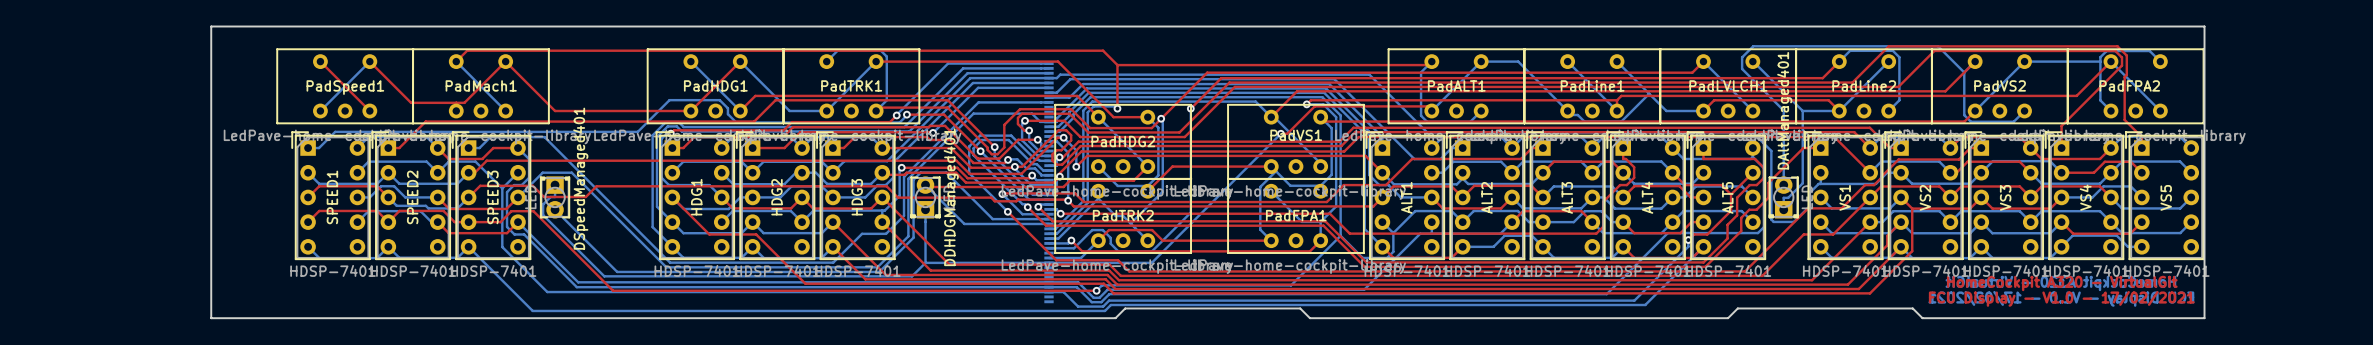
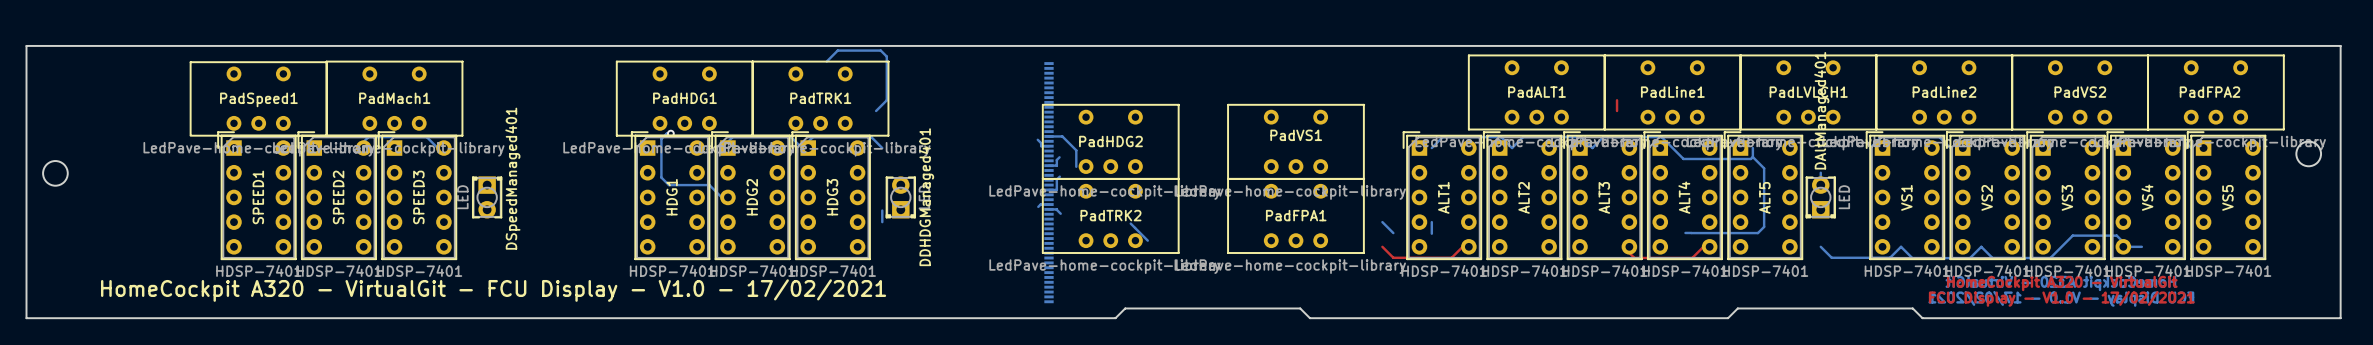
PadSpeed1 footprint: [276, 48, 414, 124] -> [190, 61, 328, 137]
top track: (320, 61) (369, 110) -> none
bottom track: (369, 61) (320, 110) -> none
top track: (369, 61) (411, 102) (464, 102) (505, 61) (555, 110) (690, 110) (740, 61) -> none
bottom track: (456, 61) (505, 110) -> none
top track: (456, 61) (467, 50) (1103, 50) (1117, 65) -> none
bottom track: (690, 61) (740, 110) -> none
bottom track: (740, 61) (789, 110) (826, 110) (876, 61) -> none
top track: (876, 61) (1058, 61) (1113, 117) (1147, 117) -> none
bottom track: (1431, 61) (1421, 72) (1421, 115) (1427, 121) (1470, 121) (1481, 110) -> none
top track: (1431, 61) (1428, 65) (1117, 65) -> none
bottom track: (1567, 61) (1617, 110) -> none
bottom track: (1617, 61) (1649, 93) -> none
bottom track: (1703, 61) (1752, 110) -> none
top track: (1703, 61) (1692, 72) (1207, 72) (1151, 128) (1090, 128) (1071, 109) (1020, 109) (1004, 124) (1004, 147) (997, 154) (991, 154) (947, 107) (879, 107) (876, 110) -> none
bottom track: (1752, 61) (1802, 110) -> none
bottom track: (1839, 61) (1850, 50) (1892, 50) (1899, 57) (1899, 100) (1888, 110) -> none
top track: (1839, 61) (1822, 78) (1221, 78) (1190, 108) -> none
bottom track: (1888, 61) (1839, 110) (1802, 110) -> none
top track: (1975, 61) (1945, 91) (1297, 91) (1271, 117) -> none
bottom track: (2100, 61) (2024, 61) (1975, 110) -> none
bottom track: (2110, 61) (2160, 110) -> none
top track: (2110, 61) (2076, 95) (1621, 95) (1617, 100) (1310, 100) (1306, 104) -> none
bottom track: (2160, 61) (2149, 51) (2106, 51) (2100, 57) (2100, 100) (2110, 110) -> none
bottom track: (1049, 63) (948, 63) (896, 115) -> none
top track: (1117, 65) (1117, 108) -> none
bottom track: (1049, 68) (963, 68) (904, 127) (683, 127) (678, 122) (665, 122) (652, 135) (652, 227) (683, 257) (741, 257) (752, 246) (763, 258) (821, 258) (832, 246) -> none
bottom track: (1964, 72) (1938, 46) (1753, 46) (1742, 57) (1742, 68) (1783, 110) (1783, 185) -> none
bottom track: (1964, 72) (1964, 115) (1970, 121) (2013, 121) (2024, 110) -> none
bottom track: (1049, 73) (967, 73) (909, 131) (681, 131) (676, 126) (667, 126) (657, 137) (657, 206) (683, 233) (741, 233) (752, 222) (763, 233) (821, 233) (832, 222) -> none
bottom track: (1049, 82) (973, 82) (893, 162) (893, 177) (885, 185) (877, 185) (865, 197) (832, 197) (821, 186) (791, 186) (780, 197) (740, 197) (728, 209) (683, 209) (672, 197) -> none
PadMach1 position: (481, 86) -> (394, 98)
PadHDG1 position: (715, 86) -> (684, 98)
PadTRK1 position: (851, 86) -> (820, 98)
PadALT1 position: (1456, 86) -> (1536, 92)
PadLine1 position: (1592, 86) -> (1672, 92)
PadLVLCH1 position: (1728, 86) -> (1808, 92)
PadLine2 position: (1864, 86) -> (1944, 92)
PadVS2 position: (1999, 86) -> (2080, 92)
PadFPA2 position: (2135, 86) -> (2216, 92)
bottom track: (1049, 87) (978, 87) (933, 132) -> none
bottom track: (1049, 92) (1056, 92) (1070, 79) (1334, 79) (1414, 159) (1440, 159) (1451, 148) (1462, 148) -> none
bottom track: (1649, 93) (1666, 110) (1703, 110) -> none
bottom track: (1649, 93) (1621, 121) (1584, 121) (1577, 115) (1571, 115) (1518, 61) (1481, 61) (1431, 110) -> none
bottom track: (1049, 97) (1069, 97) (1083, 84) (1329, 84) (1382, 137) (1382, 148) -> none
bottom track: (1049, 102) (978, 102) (904, 176) (904, 215) (886, 233) (862, 233) (833, 262) (670, 262) (544, 137) (490, 137) (479, 148) (468, 148) -> none
bottom track: (1306, 104) (1323, 104) (1336, 117) (1336, 206) (1320, 221) -> none
via: (1306, 104) -> none
bottom track: (1117, 108) (1115, 106) (1093, 106) (1087, 112) (1087, 202) (1056, 233) (1049, 233) -> none
via: (1117, 108) -> none
bottom track: (1190, 108) (1190, 212) (1151, 251) (1118, 251) (1110, 243) (1110, 237) (1102, 230) (1092, 230) (1073, 248) (1049, 248) -> none
via: (1190, 108) -> none
top track: (740, 110) (755, 95) (1077, 95) (1098, 117) -> none
top track: (1431, 110) (1427, 106) (1314, 106) (1287, 133) (1280, 133) -> none
top track: (1703, 110) (1714, 100) (1828, 100) (1839, 110) -> none
bottom track: (1802, 110) (1802, 183) (1788, 197) (1783, 197) (1783, 209) -> none
top track: (1975, 110) (1964, 121) (1325, 121) (1320, 117) -> none
bottom track: (906, 114) (899, 122) (736, 122) (727, 114) (727, 108) (719, 100) (669, 100) (637, 131) (335, 131) (319, 148) (308, 148) -> none
top track: (906, 114) (944, 114) (980, 151) -> none
via: (906, 114) -> none
top track: (896, 115) (890, 122) (791, 122) (783, 130) (674, 130) (670, 133) -> none
via: (896, 115) -> none
bottom track: (1098, 117) (1147, 166) -> none
bottom track: (1147, 117) (1158, 127) (1158, 175) (1147, 185) -> none
bottom track: (1320, 117) (1331, 128) (1331, 174) (1320, 185) -> none
bottom track: (1161, 118) (1162, 120) (1162, 191) (1130, 223) (1123, 215) (1115, 215) (1098, 198) -> none
via: (1161, 118) -> none
bottom track: (1025, 120) (1022, 123) (1022, 140) (1037, 155) (1049, 155) -> none
top track: (1025, 120) (1064, 120) (1080, 137) (1184, 137) (1234, 86) (1898, 86) (1934, 50) (2115, 50) (2121, 57) (2121, 65) (2061, 126) (2061, 148) -> none
via: (1025, 120) -> none
bottom track: (1049, 126) (1058, 126) (1069, 115) (1069, 112) (1088, 92) (1324, 92) (1364, 133) (1364, 229) (1382, 246) -> none
bottom track: (1029, 130) (1029, 141) (1039, 151) (1049, 151) -> none
top track: (1029, 130) (1024, 130) (1017, 124) (1017, 117) (1022, 113) (1069, 113) (1088, 132) (1179, 132) (1229, 82) (1852, 82) (1888, 46) (2117, 46) (2126, 55) (2124, 119) (2141, 137) (2141, 148) -> none
via: (1029, 130) -> none
bottom track: (1049, 131) (1059, 131) (1090, 97) (1322, 97) (1340, 115) (1340, 235) -> none
top track: (933, 132) (800, 132) (784, 148) (752, 148) -> none
via: (933, 132) -> none
bottom track: (1280, 133) (1151, 262) (925, 262) -> none
via: (1280, 133) -> none
top track: (1063, 137) (1057, 137) (1021, 173) (969, 173) (956, 160) (486, 160) (474, 172) (468, 172) -> none
via: (1063, 137) -> none
top track: (1037, 139) (1018, 139) (999, 158) (977, 158) (945, 125) (792, 127) (783, 137) (694, 137) (683, 148) (672, 148) -> none
via: (1037, 139) -> none
round board edge: none -> [2295, 140, 2322, 168]
bottom track: (1049, 141) (1056, 141) (1068, 152) (1068, 200) -> none
PadHDG2 position: (1123, 141) -> (1110, 141)
bottom track: (994, 147) (994, 156) (1032, 194) (1049, 194) -> none
top track: (994, 147) (947, 100) (775, 100) (754, 121) (425, 121) (399, 148) (388, 148) -> none
via: (994, 147) -> none
top track: (437, 148) (448, 158) (482, 158) (493, 148) (518, 148) -> none
bottom track: (518, 148) (529, 159) (529, 177) (521, 185) (514, 185) (507, 192) (507, 226) (514, 234) (524, 234) (576, 287) (1076, 287) (1091, 302) (1101, 302) (1109, 294) (1606, 294) (1667, 233) (1685, 233) -> none
top track: (832, 148) (843, 148) (854, 137) (927, 137) (930, 139) (950, 139) (973, 163) (1004, 163) (1008, 159) -> none
top track: (882, 148) (951, 148) (970, 167) (1022, 166) (1058, 130) (1066, 130) (1071, 135) (1071, 140) (1061, 150) (1056, 150) (1052, 154) (1052, 160) (1056, 164) (1062, 164) (1080, 146) (1341, 146) (1355, 132) (1854, 132) (1870, 148) -> none
top track: (1542, 148) (1532, 148) (1521, 158) (1412, 158) (1386, 185) (1343, 185) (1326, 202) (1083, 202) (1075, 193) (1002, 194) -> none
top track: (1623, 148) (1623, 158) (1625, 158) (1634, 167) (1634, 177) (1626, 185) (1620, 185) (1603, 201) (1603, 226) (1596, 233) (1349, 233) (1329, 213) (1060, 213) -> none
top track: (1703, 148) (1703, 158) (1755, 158) (1763, 167) (1763, 178) (1756, 185) (1749, 185) (1737, 197) (1737, 215) (1727, 224) (1727, 238) (1703, 262) (1366, 262) (1325, 221) (1052, 221) (1038, 206) -> none
top track: (1820, 148) (1803, 148) (1768, 182) (1768, 197) (1756, 209) (1749, 209) (1741, 217) (1741, 231) (1705, 266) (1364, 266) (1323, 225) (1046, 225) (1027, 207) -> none
top track: (1901, 148) (1890, 148) (1869, 127) (1353, 127) (1339, 141) (1078, 141) (1062, 157) (1059, 157) -> none
top track: (1950, 148) (1961, 137) (2019, 137) (2041, 158) (2100, 158) (2110, 148) -> none
top track: (1981, 148) (1970, 148) (1958, 159) (1898, 159) (1874, 185) (1865, 185) (1841, 208) (1808, 208) (1745, 271) (1129, 271) (1118, 260) (1056, 260) (1007, 211) -> none
bottom track: (980, 151) (1029, 199) (1049, 199) -> none
via: (980, 151) -> none
via: (1059, 157) -> none
bottom track: (1008, 159) (1017, 159) (1026, 168) (1035, 168) (1041, 175) (1049, 175) -> none
via: (1008, 159) -> none
round board edge: none -> [42, 160, 69, 187]
bottom track: (1049, 160) (1035, 159) (1011, 135) (980, 135) (969, 146) (969, 173) (1007, 211) -> none
bottom track: (1014, 166) (1031, 185) (1049, 185) -> none
via: (1014, 166) -> none
top track: (1076, 166) (1087, 155) (1365, 155) (1382, 172) -> none
via: (1076, 166) -> none
bottom track: (1098, 166) (1117, 185) (1147, 185) -> none
top track: (1147, 166) (1133, 180) (1069, 180) (1063, 187) (927, 187) (925, 185) -> none
top track: (1271, 166) (1172, 166) (1147, 191) -> none
bottom track: (1320, 166) (1320, 163) (1274, 117) (1271, 117) (1255, 101) (1092, 101) (1083, 110) (1083, 201) (1055, 228) (1049, 228) -> none
bottom track: (901, 167) (899, 169) (899, 195) (884, 210) (813, 210) (802, 222) (790, 210) (732, 210) (721, 222) -> none
top track: (901, 167) (957, 167) (967, 178) (1029, 178) (1032, 175) -> none
via: (901, 167) -> none
bottom track: (1049, 170) (1043, 170) (1036, 164) (1032, 164) (1008, 140) (981, 140) (973, 148) (973, 155) (1027, 207) -> none
bottom track: (1275, 171) (1290, 185) (1320, 185) -> none
bottom track: (1275, 171) (1260, 186) (1260, 229) (1271, 240) -> none
bottom track: (308, 172) (319, 183) (377, 183) (388, 172) (399, 183) (457, 183) (468, 172) -> none
bottom track: (357, 172) (368, 161) (426, 161) (437, 172) (448, 161) (475, 161) (502, 188) -> none
bottom track: (518, 172) (502, 188) -> none
bottom track: (672, 172) (683, 161) (741, 161) (752, 172) (763, 161) (821, 161) (832, 172) (844, 161) (887, 161) (970, 78) (1056, 78) (1060, 74) (1369, 74) (1427, 132) (1752, 132) (1771, 150) (1771, 219) (1773, 221) (1793, 221) (1809, 206) (1809, 193) (1818, 183) (1875, 183) (1887, 172) (1901, 172) (1912, 183) (1970, 183) (1992, 161) (2050, 161) (2061, 172) -> none
bottom track: (721, 172) (733, 184) (784, 184) (795, 172) (815, 172) (827, 183) (871, 183) (882, 172) -> none
top track: (882, 172) (884, 174) (956, 172) (965, 182) (1053, 182) (1059, 176) (1059, 173) (1081, 151) (1344, 151) (1358, 137) (1834, 137) (1870, 172) -> none
bottom track: (1382, 172) (1393, 184) (1456, 184) (1462, 178) -> none
bottom track: (1431, 172) (1442, 172) (1453, 161) (1501, 161) (1512, 172) (1523, 161) (1581, 161) (1592, 172) (1603, 161) (1661, 161) (1672, 172) -> none
bottom track: (1542, 172) (1531, 184) (1468, 184) (1462, 178) -> none
top track: (1542, 172) (1553, 161) (1612, 161) (1623, 172) -> none
bottom track: (1623, 172) (1634, 183) (1692, 183) (1703, 172) -> none
top track: (1672, 172) (1684, 185) (1721, 185) (1731, 194) -> none
top track: (1752, 172) (1731, 194) -> none
bottom track: (1870, 172) (1881, 161) (1939, 161) (1950, 172) -> none
top track: (1950, 172) (1956, 172) (1967, 161) (2019, 161) (2030, 172) -> none
bottom track: (2030, 172) (2041, 183) (2100, 183) (2122, 161) (2180, 161) (2191, 172) -> none
top track: (2061, 172) (2093, 172) (2104, 161) (2130, 161) (2141, 172) -> none
bottom track: (1032, 175) (1036, 180) (1049, 180) -> none
via: (1032, 175) -> none
via: (1059, 176) -> none
bottom track: (555, 185) (555, 197) (550, 197) (543, 204) (543, 215) (604, 276) (912, 276) (925, 262) -> none
bottom track: (925, 185) (964, 223) (1049, 223) -> none
bottom track: (502, 188) (502, 247) (547, 292) (1063, 292) (1078, 306) (1103, 306) (1109, 300) (1634, 300) (1688, 246) (1688, 240) -> none
bottom track: (1271, 191) (1301, 221) (1320, 221) -> none
bottom track: (1002, 194) (1022, 214) (1049, 214) -> none
via: (1002, 194) -> none
top track: (1731, 194) (1731, 210) (1707, 234) (1693, 234) (1688, 240) -> none
SPEED1 position: (331, 195) -> (257, 195)
SPEED2 position: (411, 195) -> (337, 195)
SPEED3 position: (491, 195) -> (417, 195)
HDG1 position: (695, 195) -> (670, 195)
HDG2 position: (775, 195) -> (750, 195)
HDG3 position: (855, 195) -> (831, 195)
ALT1 position: (1405, 195) -> (1442, 195)
ALT2 position: (1485, 195) -> (1522, 195)
ALT3 position: (1565, 195) -> (1603, 195)
ALT4 position: (1646, 195) -> (1683, 195)
ALT5 position: (1726, 195) -> (1763, 195)
VS1 position: (1843, 195) -> (1905, 195)
VS2 position: (1924, 195) -> (1985, 195)
VS3 position: (2004, 195) -> (2066, 195)
VS4 position: (2084, 195) -> (2146, 195)
VS5 position: (2164, 195) -> (2226, 195)
top track: (308, 197) (319, 186) (377, 186) (388, 197) -> none
bottom track: (357, 197) (369, 197) (381, 186) (394, 186) (405, 197) (437, 197) -> none
bottom track: (388, 197) (396, 205) (425, 205) (428, 208) (457, 208) (468, 197) -> none
top track: (437, 197) (449, 208) (506, 208) (518, 197) -> none
top track: (468, 197) (480, 185) (532, 185) (543, 197) (585, 197) (596, 186) (886, 186) (898, 197) (991, 197) (994, 201) (1067, 199) (1073, 206) (1373, 206) (1393, 186) (1451, 186) (1462, 197) (1474, 185) (1531, 185) (1542, 197) -> none
bottom track: (518, 197) (542, 172) (571, 172) (666, 267) (877, 267) (908, 236) (908, 178) (973, 113) (1031, 113) (1040, 121) (1056, 121) (1056, 118) (1086, 88) (1326, 88) (1369, 131) (1369, 175) (1379, 185) (1388, 185) (1400, 197) (1431, 197) -> none
DSpeedManaged401 position: (555, 197) -> (487, 197)
top track: (672, 197) (709, 234) (756, 234) (805, 283) (1103, 283) (1113, 293) (1870, 293) (1912, 251) (1912, 208) -> none
top track: (721, 197) (732, 208) (791, 208) (802, 197) (813, 208) (871, 208) (882, 197) (949, 264) (1109, 264) (1120, 275) (1762, 275) (1803, 234) (1833, 234) (1881, 186) (1939, 186) (1950, 197) (1961, 186) (2019, 186) (2030, 197) (2041, 186) (2099, 186) (2110, 197) -> none
DDHDGManaged401 position: (925, 197) -> (900, 197)
top track: (1431, 197) (1442, 208) (1501, 208) (1512, 197) -> none
bottom track: (1512, 197) (1523, 208) (1581, 208) (1592, 197) (1603, 197) (1615, 208) (1661, 208) (1672, 197) (1684, 197) (1695, 186) (1741, 186) (1752, 197) -> none
bottom track: (1542, 197) (1553, 186) (1612, 186) (1623, 197) -> none
top track: (1623, 197) (1634, 186) (1679, 186) (1690, 197) (1703, 197) -> none
DAltManaged401 position: (1783, 197) -> (1820, 197)
bottom track: (1820, 197) (1831, 208) (1890, 208) (1901, 197) -> none
top track: (1901, 197) (1912, 208) -> none
bottom track: (2061, 197) (2092, 197) (2103, 186) (2130, 186) (2141, 197) -> none
top track: (2061, 197) (2050, 208) (1992, 208) (1981, 197) (1970, 208) (1912, 208) -> none
bottom track: (2110, 197) (2121, 208) (2180, 208) (2191, 197) -> none
bottom track: (1098, 198) (1058, 238) (1049, 238) -> none
via: (1068, 200) -> none
via: (1038, 206) -> none
via: (1027, 207) -> none
bottom track: (555, 209) (617, 271) (879, 271) (913, 237) (913, 179) (920, 172) (946, 172) (992, 219) (1049, 219) -> none
bottom track: (925, 209) (925, 262) -> none
via: (1007, 211) -> none
via: (1060, 213) -> none
PadTRK2 position: (1123, 215) -> (1110, 215)
bottom track: (1320, 221) (1320, 240) -> none
top track: (308, 222) (319, 210) (377, 210) (388, 222) (399, 210) (443, 210) (454, 222) (500, 222) (511, 211) (533, 211) (613, 290) (1096, 290) -> none
bottom track: (357, 222) (368, 211) (420, 211) (431, 222) (437, 222) -> none
top track: (437, 222) (448, 233) (506, 233) (518, 222) -> none
bottom track: (518, 222) (578, 282) (1078, 282) (1093, 297) (1099, 297) (1107, 289) (1364, 289) (1420, 233) (1500, 233) (1512, 222) -> none
top track: (832, 222) (885, 274) (1107, 274) (1117, 284) (1847, 284) (1887, 245) (1887, 235) (1901, 222) -> none
top track: (882, 222) (930, 270) (1109, 270) (1119, 280) (1812, 280) (1870, 222) -> none
top track: (1512, 222) (1523, 211) (1581, 211) (1592, 222) -> none
bottom track: (1592, 222) (1603, 233) (1661, 233) (1683, 211) (1741, 211) (1752, 222) -> none
bottom track: (1623, 222) (1612, 222) (1601, 211) (1584, 211) (1573, 222) (1529, 222) (1517, 211) (1473, 211) (1462, 222) (1451, 211) (1415, 211) (1393, 233) (1393, 251) (1387, 257) (1362, 257) (1340, 235) -> none
top track: (1623, 222) (1634, 233) (1680, 233) (1691, 222) (1703, 222) -> none
bottom track: (1820, 222) (1831, 233) (1890, 233) (1901, 222) (1912, 233) (1970, 233) (1981, 222) (1992, 233) (2050, 233) (2061, 222) -> none
bottom track: (1870, 222) (1882, 222) (1893, 211) (1939, 211) (1950, 222) (1961, 211) (2019, 211) (2030, 222) (2041, 211) (2100, 211) (2121, 233) (2180, 233) (2191, 222) -> none
top track: (2061, 222) (2073, 233) (2130, 233) (2141, 222) -> none
bottom track: (1340, 235) (1291, 285) (1102, 285) (1096, 290) -> none
bottom track: (1071, 240) (1068, 243) (1049, 243) -> none
top track: (1071, 240) (1082, 251) (1309, 251) (1320, 240) -> none
via: (1071, 240) -> none
bottom track: (1098, 240) (1081, 258) (1049, 258) -> none
top track: (1162, 240) (1152, 230) (1108, 230) (1098, 240) -> none
top track: (1162, 240) (1271, 240) -> none
via: (1688, 240) -> none
bottom track: (308, 246) (319, 258) (377, 258) (388, 246) (399, 257) (457, 257) (468, 246) (532, 310) (1104, 310) (1110, 305) (1645, 305) (1703, 246) -> none
top track: (832, 246) (865, 279) (1105, 279) (1115, 288) (1858, 288) (1901, 246) -> none
bottom track: (1462, 246) (1493, 246) (1504, 235) (1531, 235) (1553, 257) (1612, 257) (1623, 246) -> none
text: none -> HomeCockpit A320 - VirtualGit - FCU Display - V1.0 - 17/02/2021 (493, 290)
via: (1096, 290) -> none
board edge: (211, 318) (211, 26) (2204, 26) (2204, 318) -> (211, 318) (26, 318) (26, 45) (2340, 45) (2340, 318) (2204, 318)

